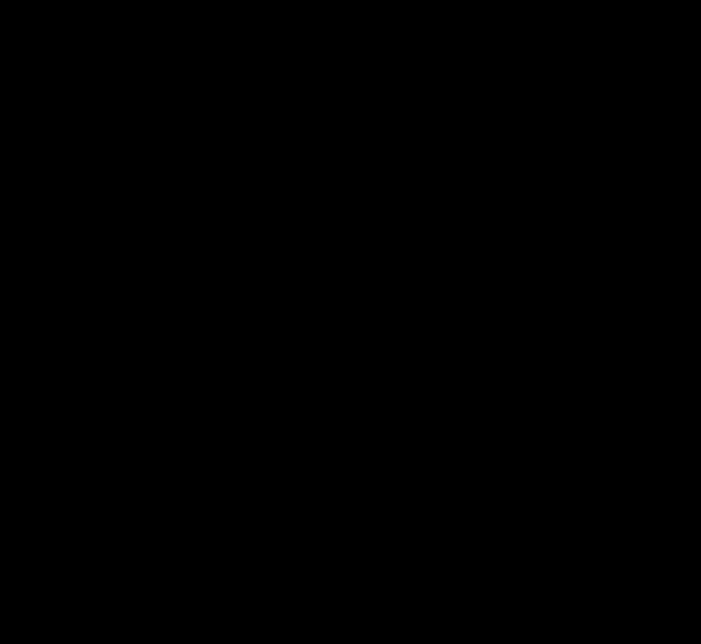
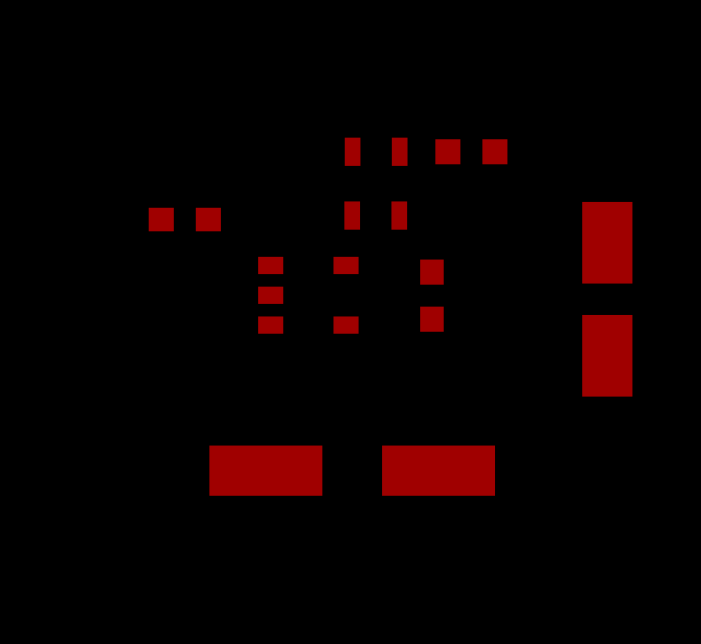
part: none -> (376, 151)
part: none -> (471, 151)
part: none -> (375, 215)
part: none -> (184, 219)
part: none -> (308, 295)
part: none -> (431, 295)
part: none -> (607, 299)
part: none -> (352, 470)

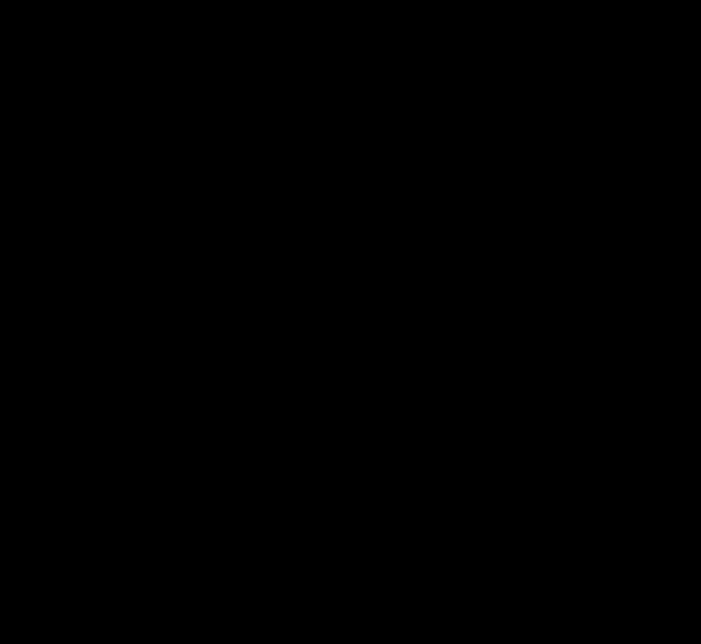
part: (376, 151) -> none
part: (471, 151) -> none
part: (375, 215) -> none
part: (184, 219) -> none
part: (308, 295) -> none
part: (431, 295) -> none
part: (607, 299) -> none
part: (352, 470) -> none

